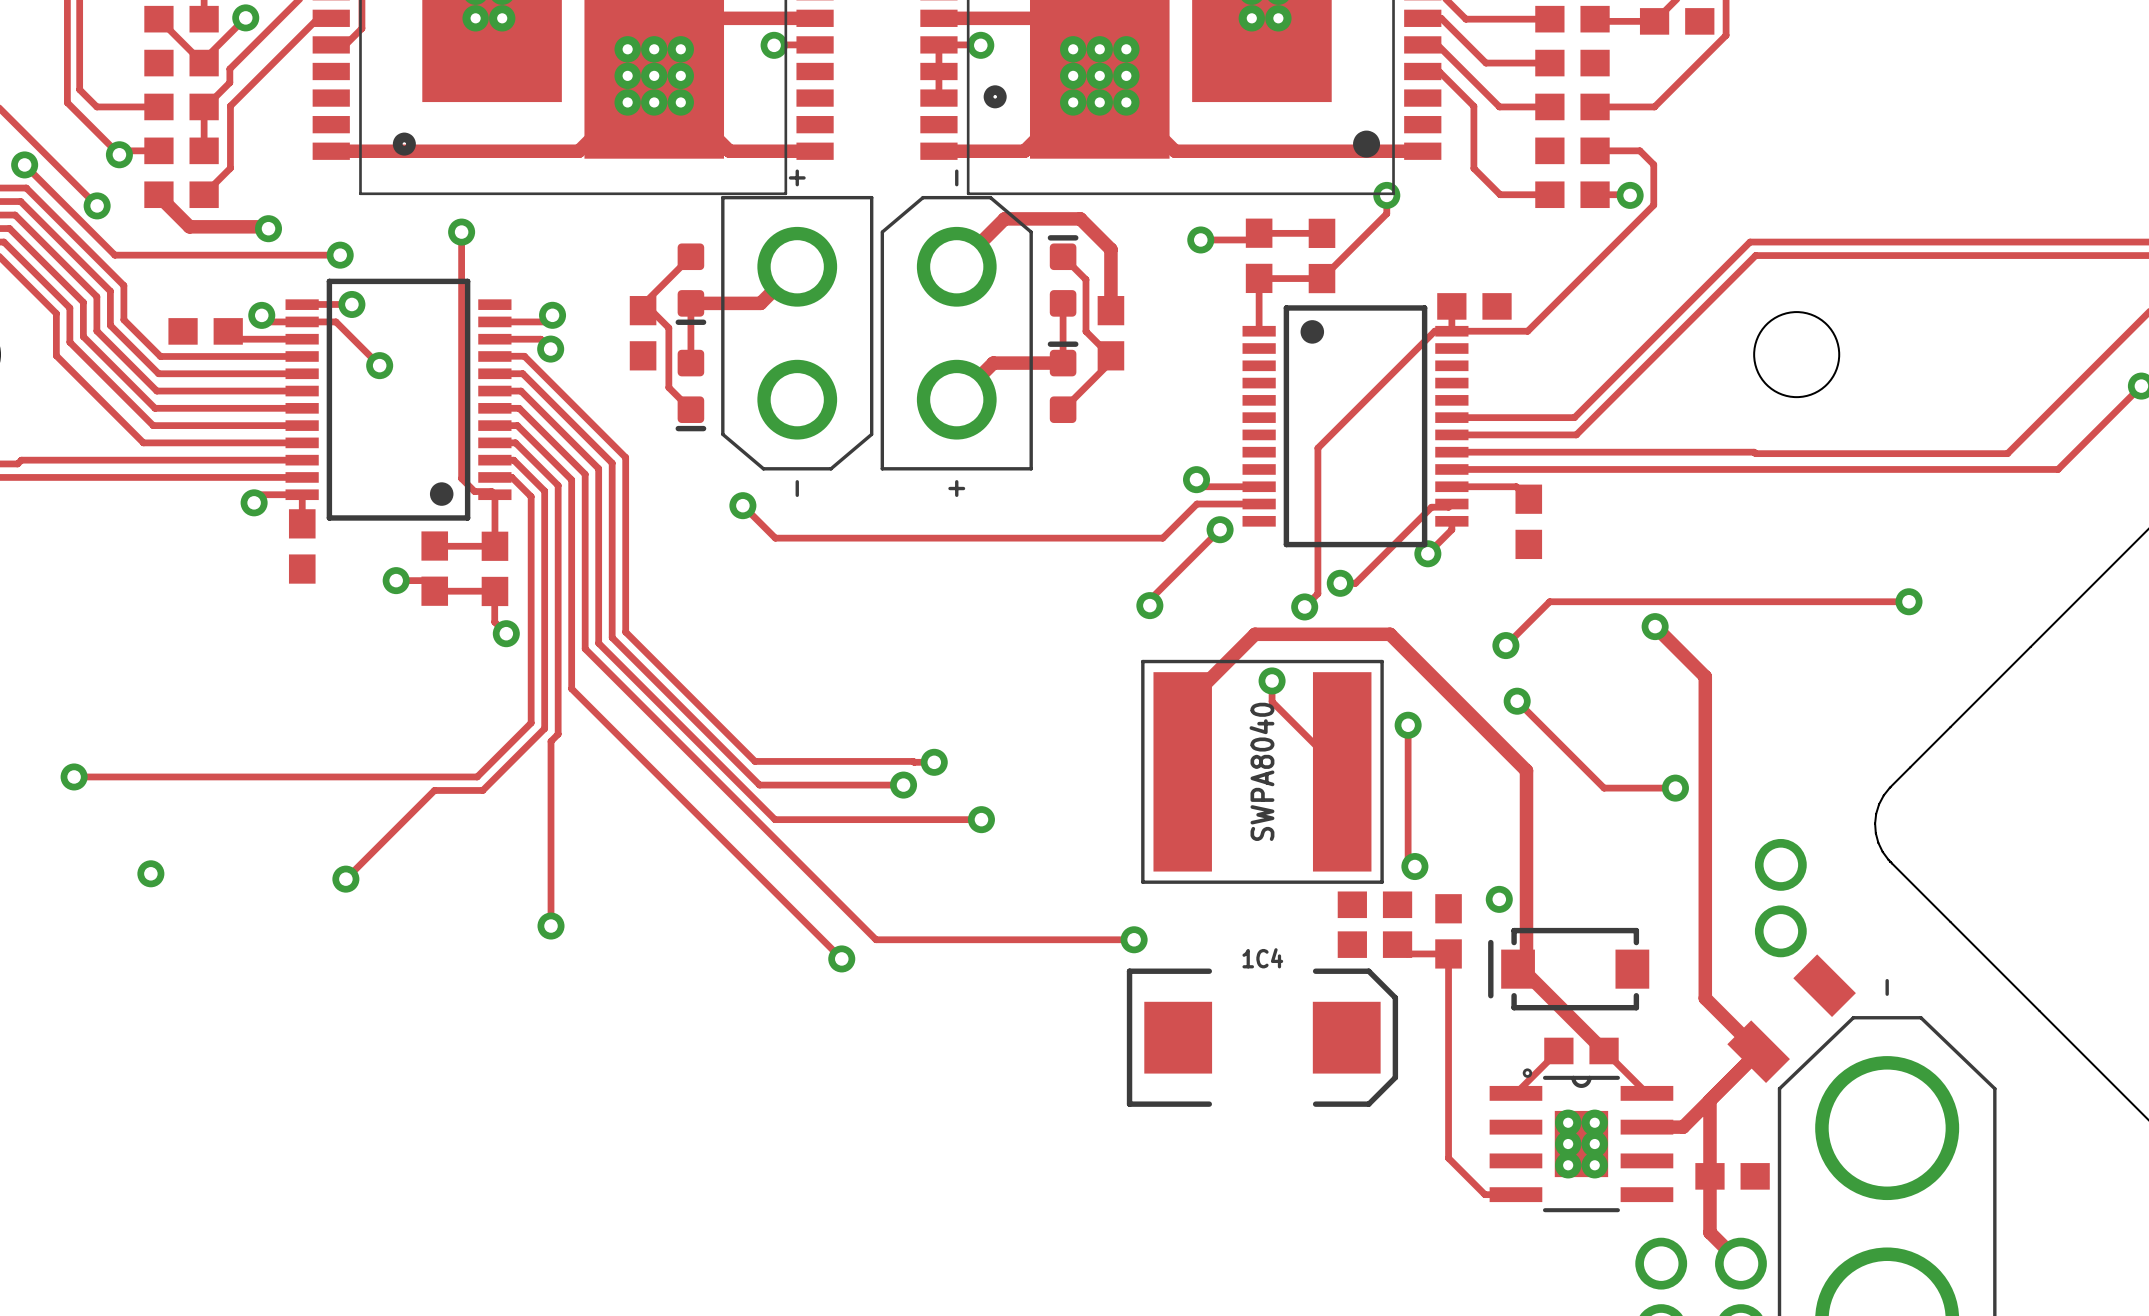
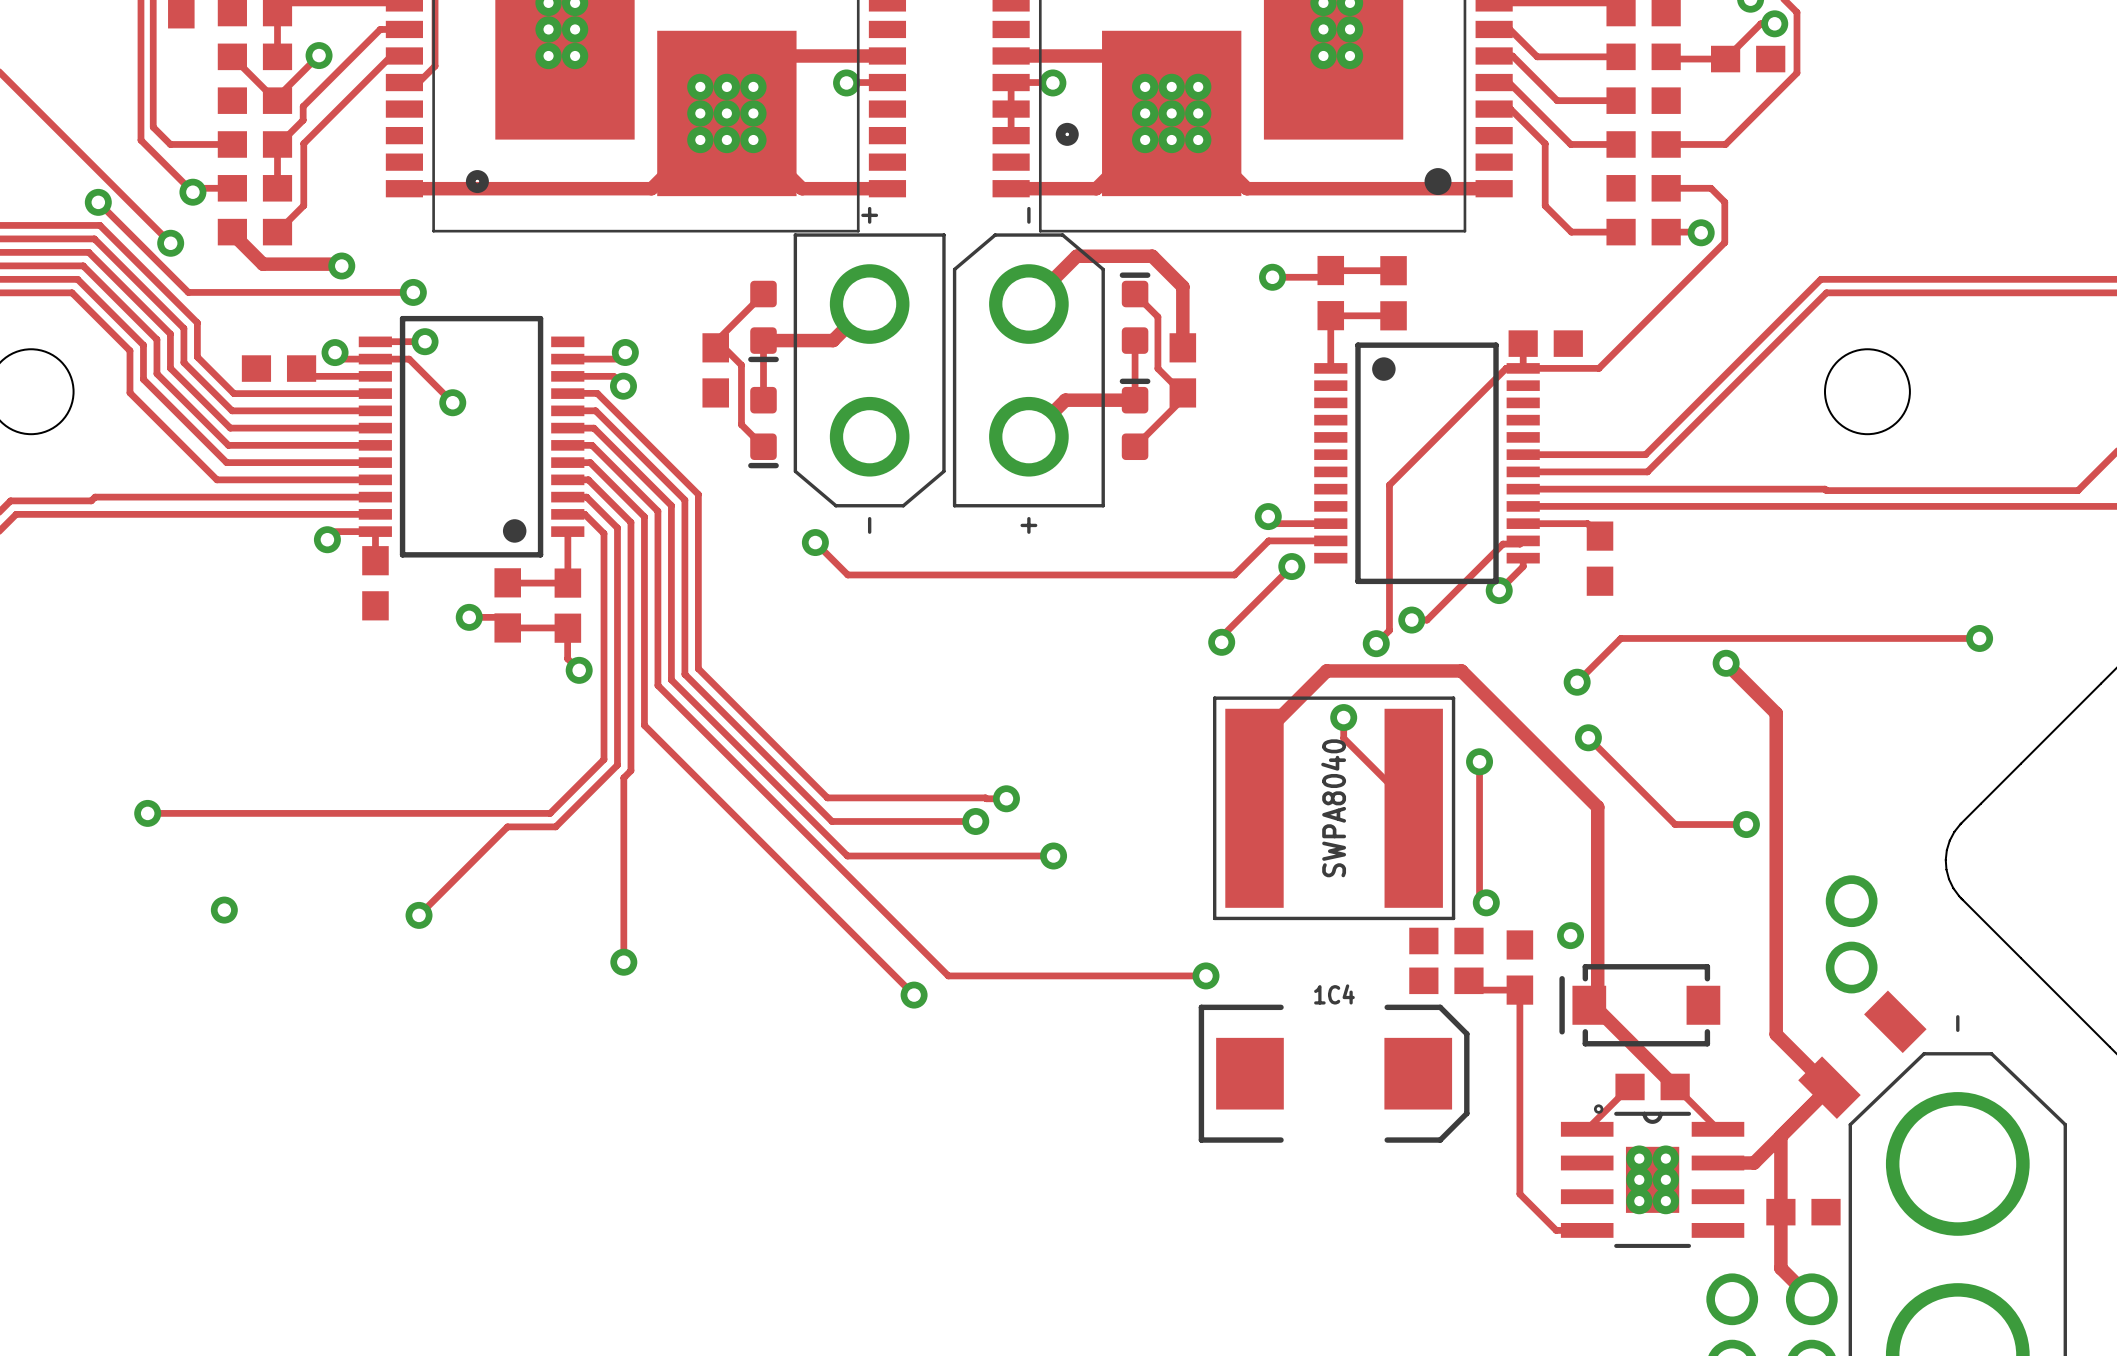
track: (1386, 195) (1386, 213) (1321, 278) -> none
via: (1386, 195) -> none
track: (461, 232) (461, 478) (474, 491) (491, 491) (494, 494) -> none
via: (461, 232) -> none

